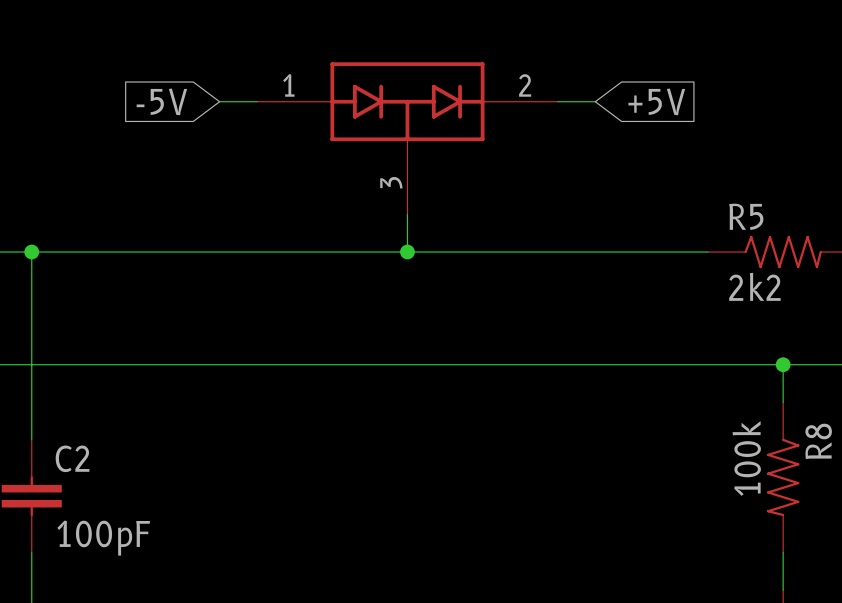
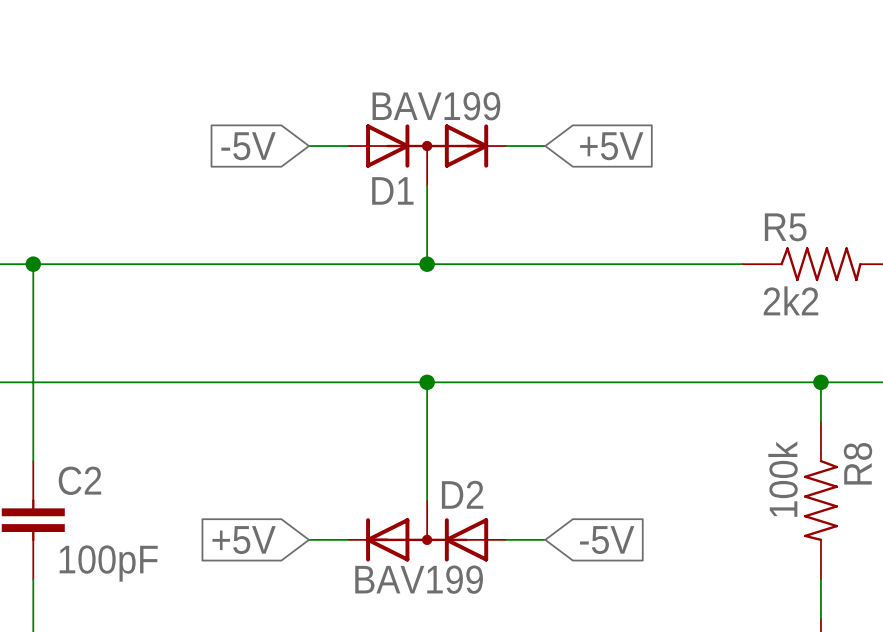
global label position: -5V (161, 101) -> -5V (248, 146)
wire: (219, 101) (257, 101) -> (308, 146) (348, 146)
wire: (557, 101) (595, 101) -> (505, 146) (545, 146)
global label position: +5V (656, 101) -> +5V (611, 146)
part: (407, 138) -> none
D1: none -> BAV199 (427, 154)
wire: none -> (427, 382) (427, 500)
junction: none -> (427, 382)
D2: none -> BAV199 (427, 531)
global label: none -> +5V (244, 540)
wire: none -> (308, 539) (348, 539)
wire: none -> (505, 539) (545, 539)
global label: none -> -5V (607, 540)

